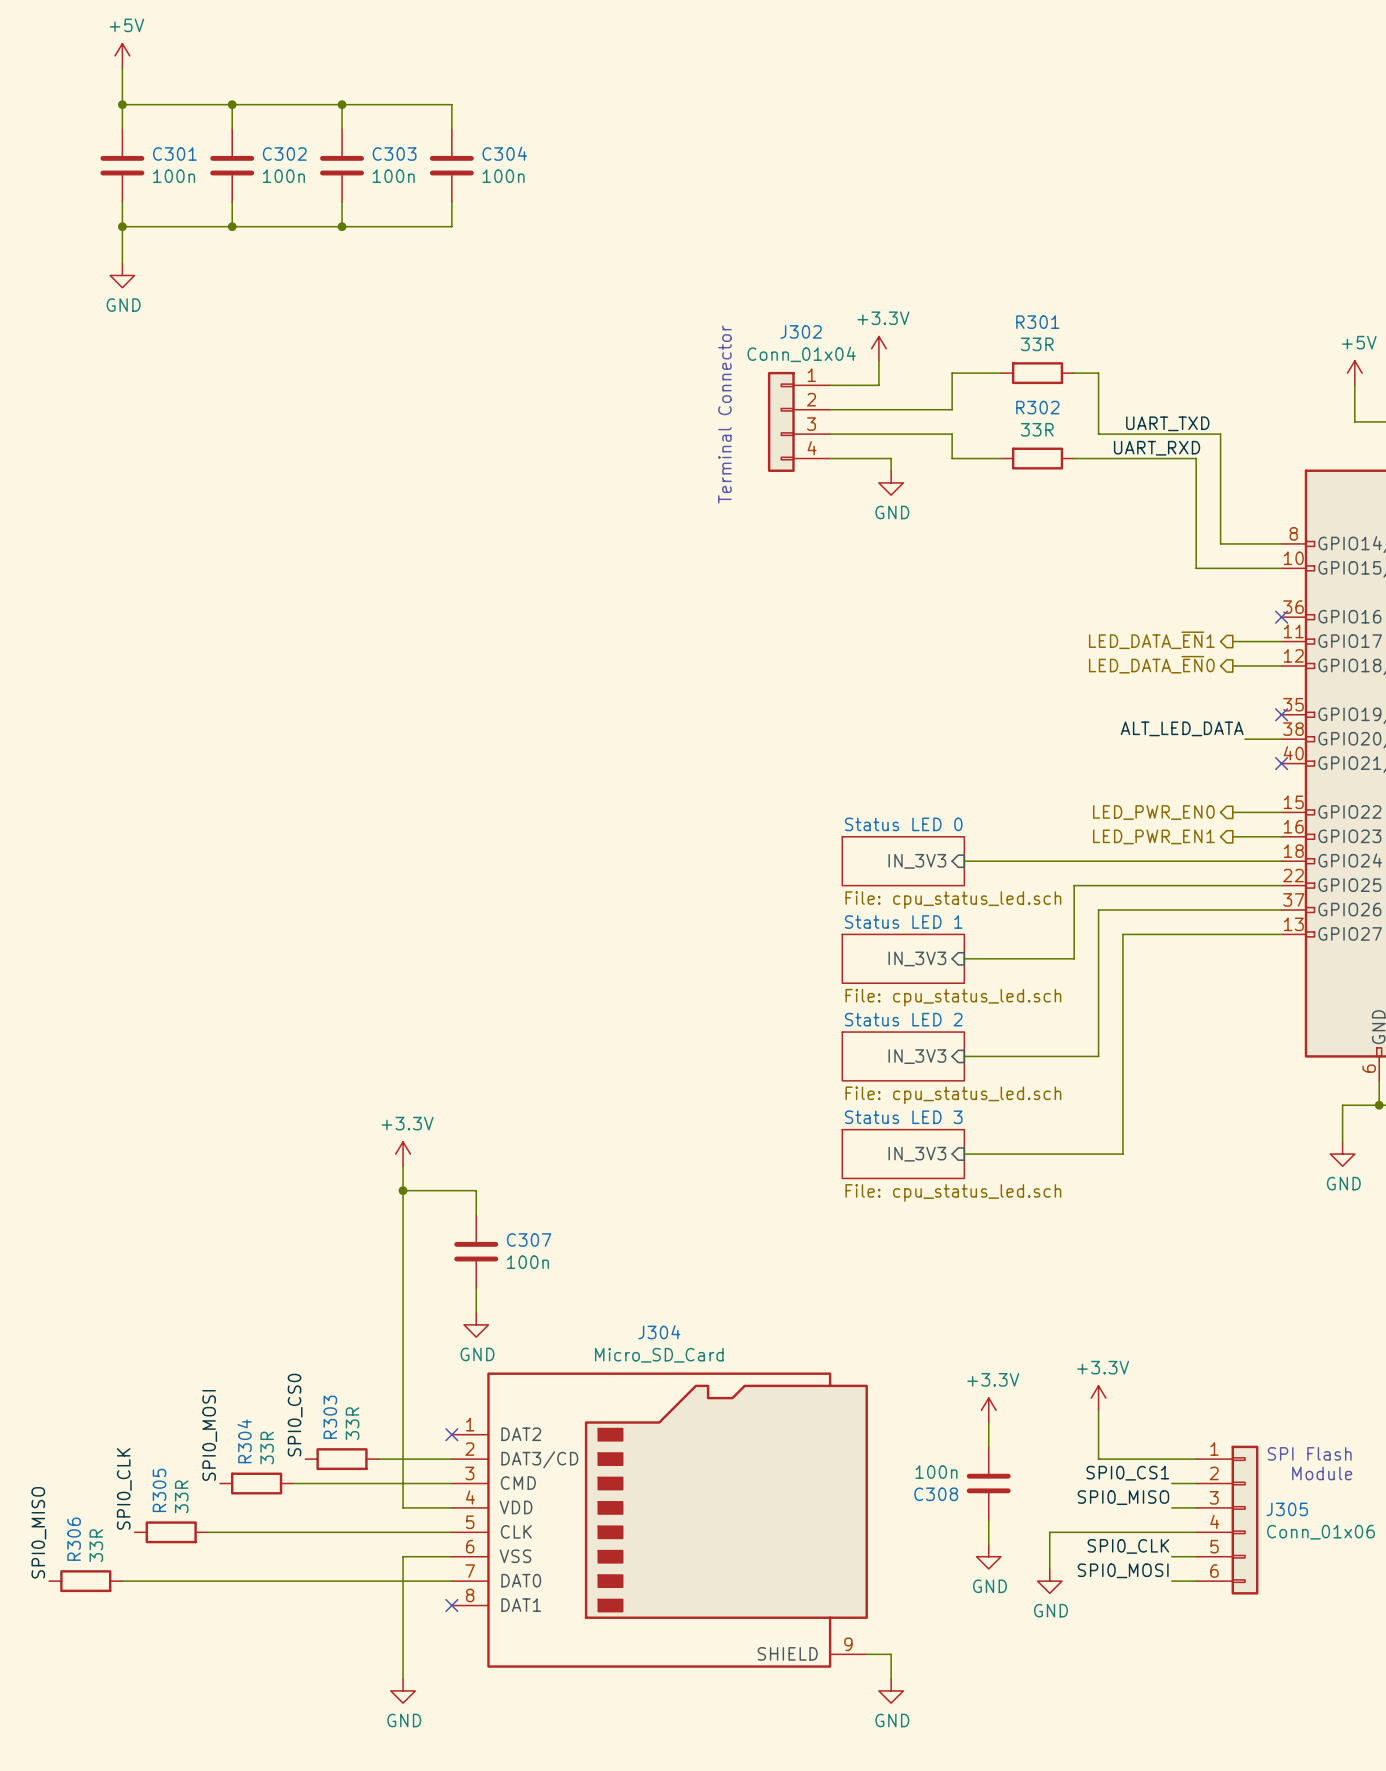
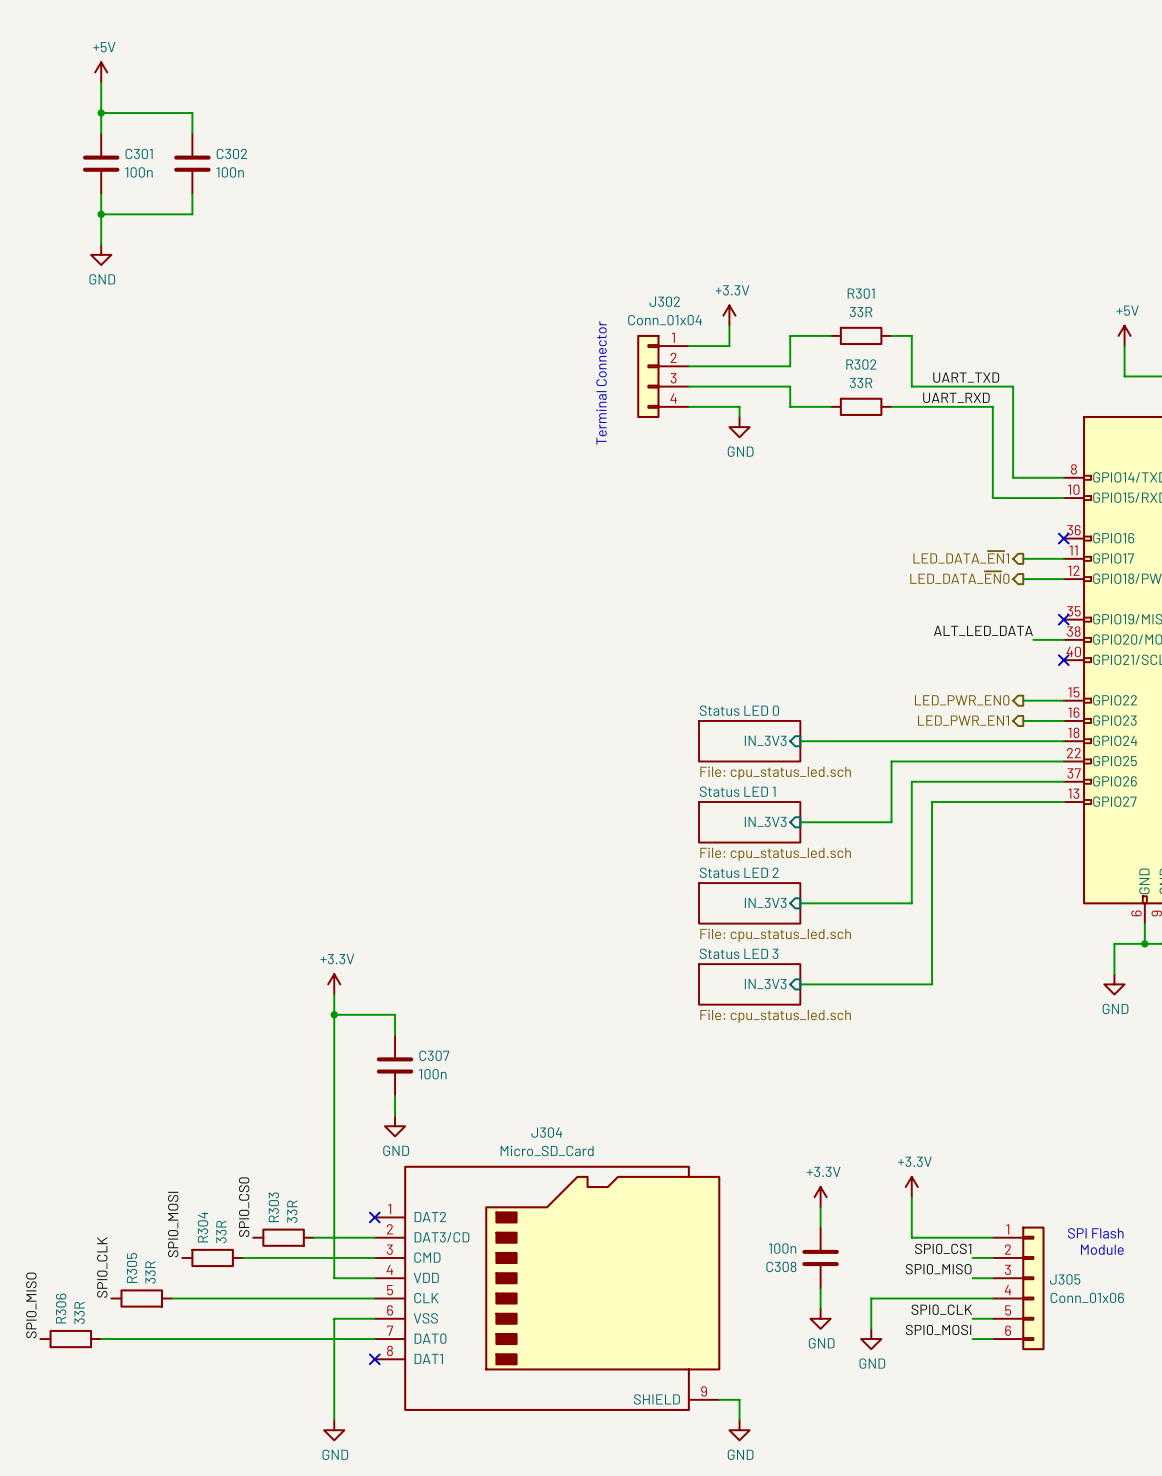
wire: (232, 104) (451, 104) (451, 129) -> none
junction: (232, 104) -> none
wire: (342, 104) (342, 129) -> none
junction: (342, 104) -> none
C303: 100n (342, 165) -> none
C304: 100n (451, 165) -> none
wire: (342, 202) (342, 226) -> none
wire: (451, 202) (451, 226) (232, 226) -> none
junction: (232, 226) -> none
junction: (342, 226) -> none

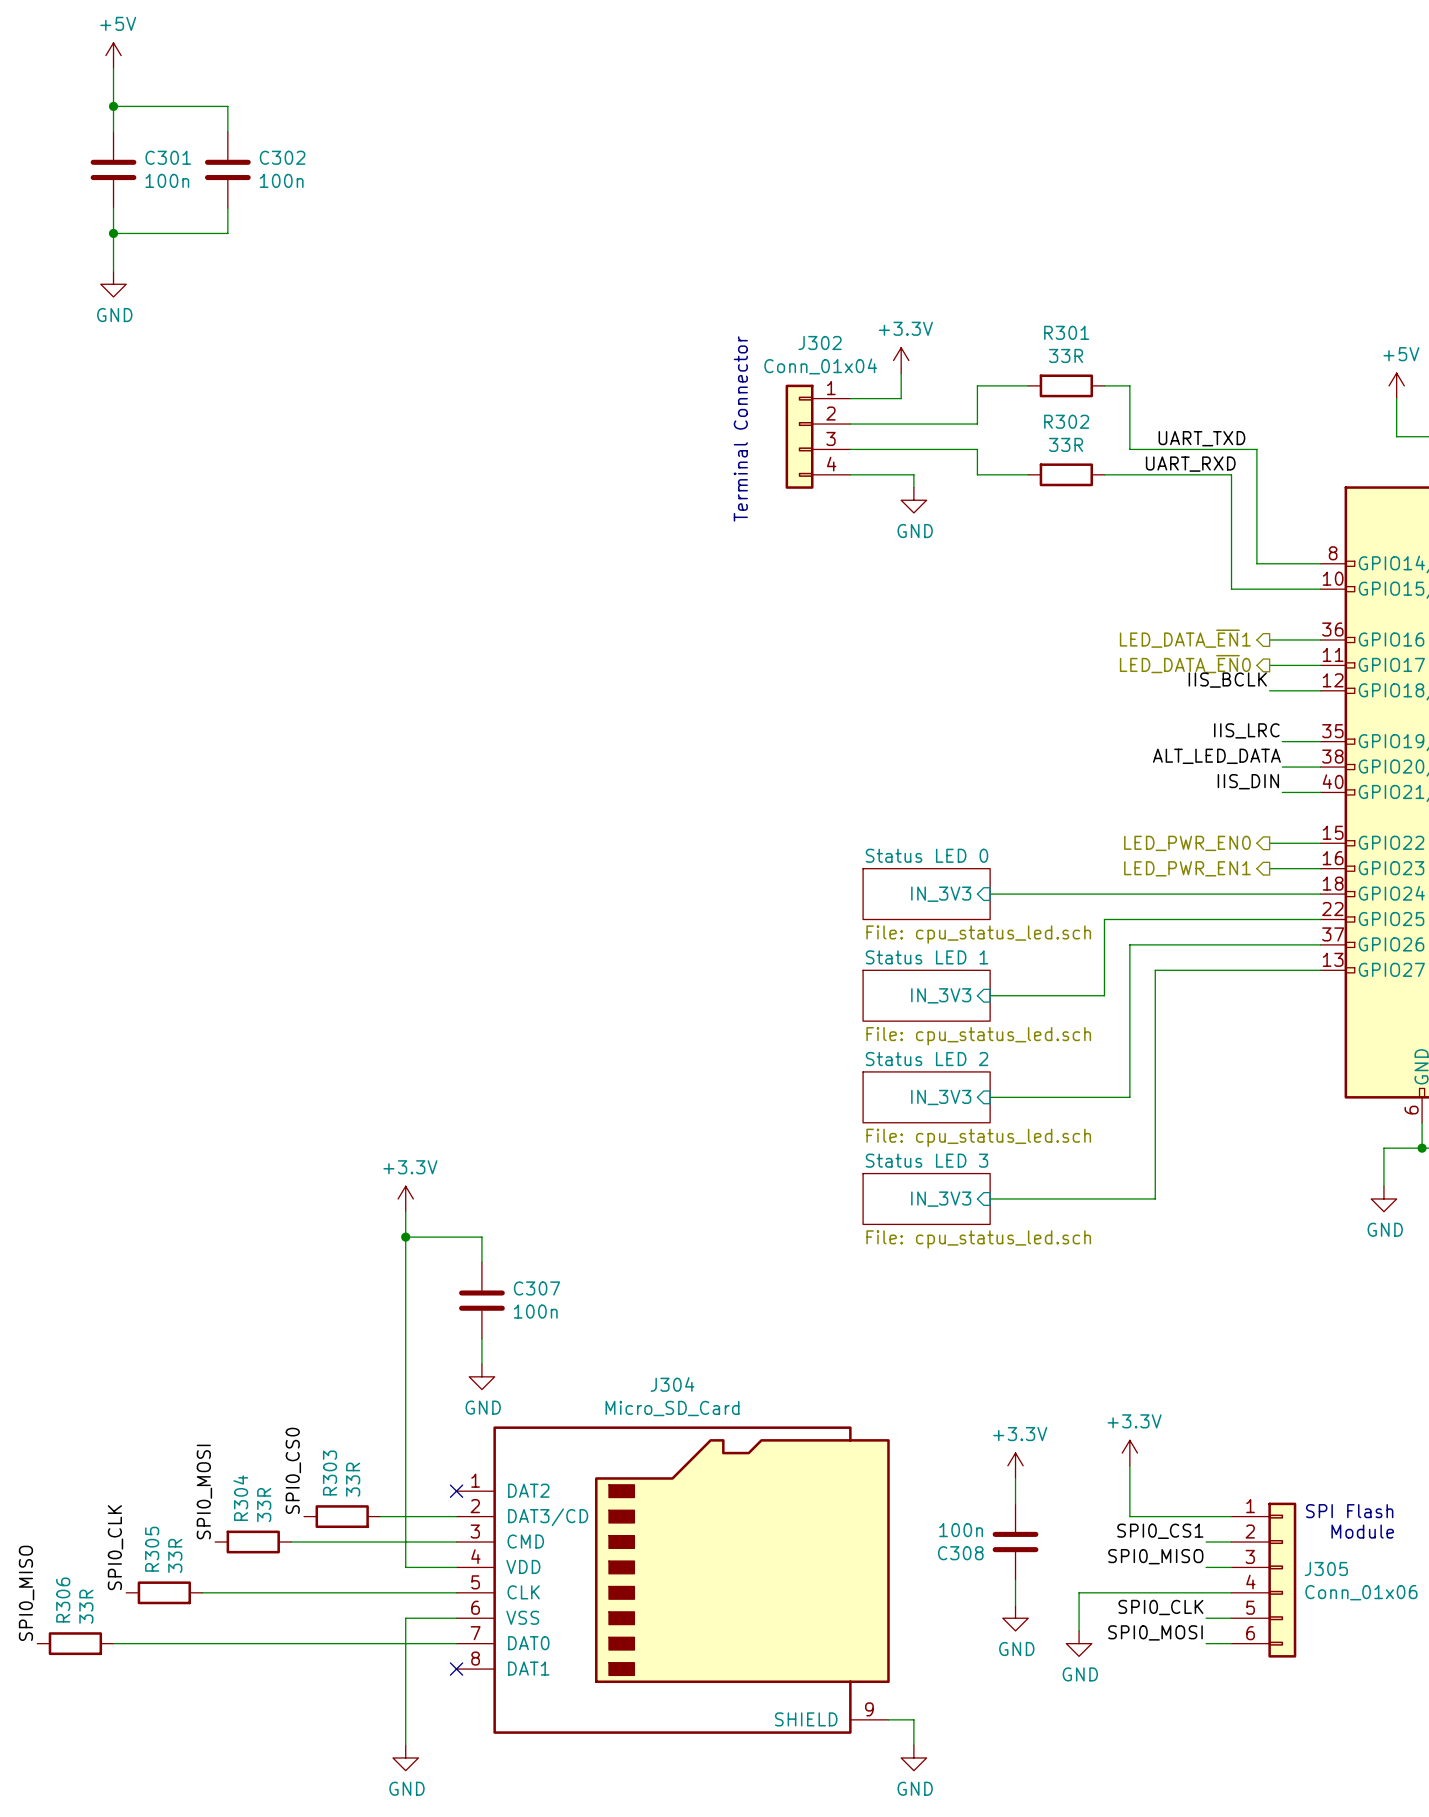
hierarchical label: none -> LED_DATA_~{EN}1 (1185, 638)
wire: none -> (1269, 639) (1320, 639)
no-connect mark: (1063, 538) -> none
hierarchical label: LED_DATA_~{EN}1 (961, 557) -> LED_DATA_~{EN}0 (1185, 664)
label: none -> IIS_BCLK (1227, 680)
hierarchical label: LED_DATA_~{EN}0 (959, 577) -> none
label: none -> IIS_LRC (1246, 730)
wire: none -> (1282, 741) (1320, 741)
no-connect mark: (1063, 619) -> none
label: none -> IIS_DIN (1248, 781)
wire: none -> (1282, 792) (1320, 792)
no-connect mark: (1063, 660) -> none

